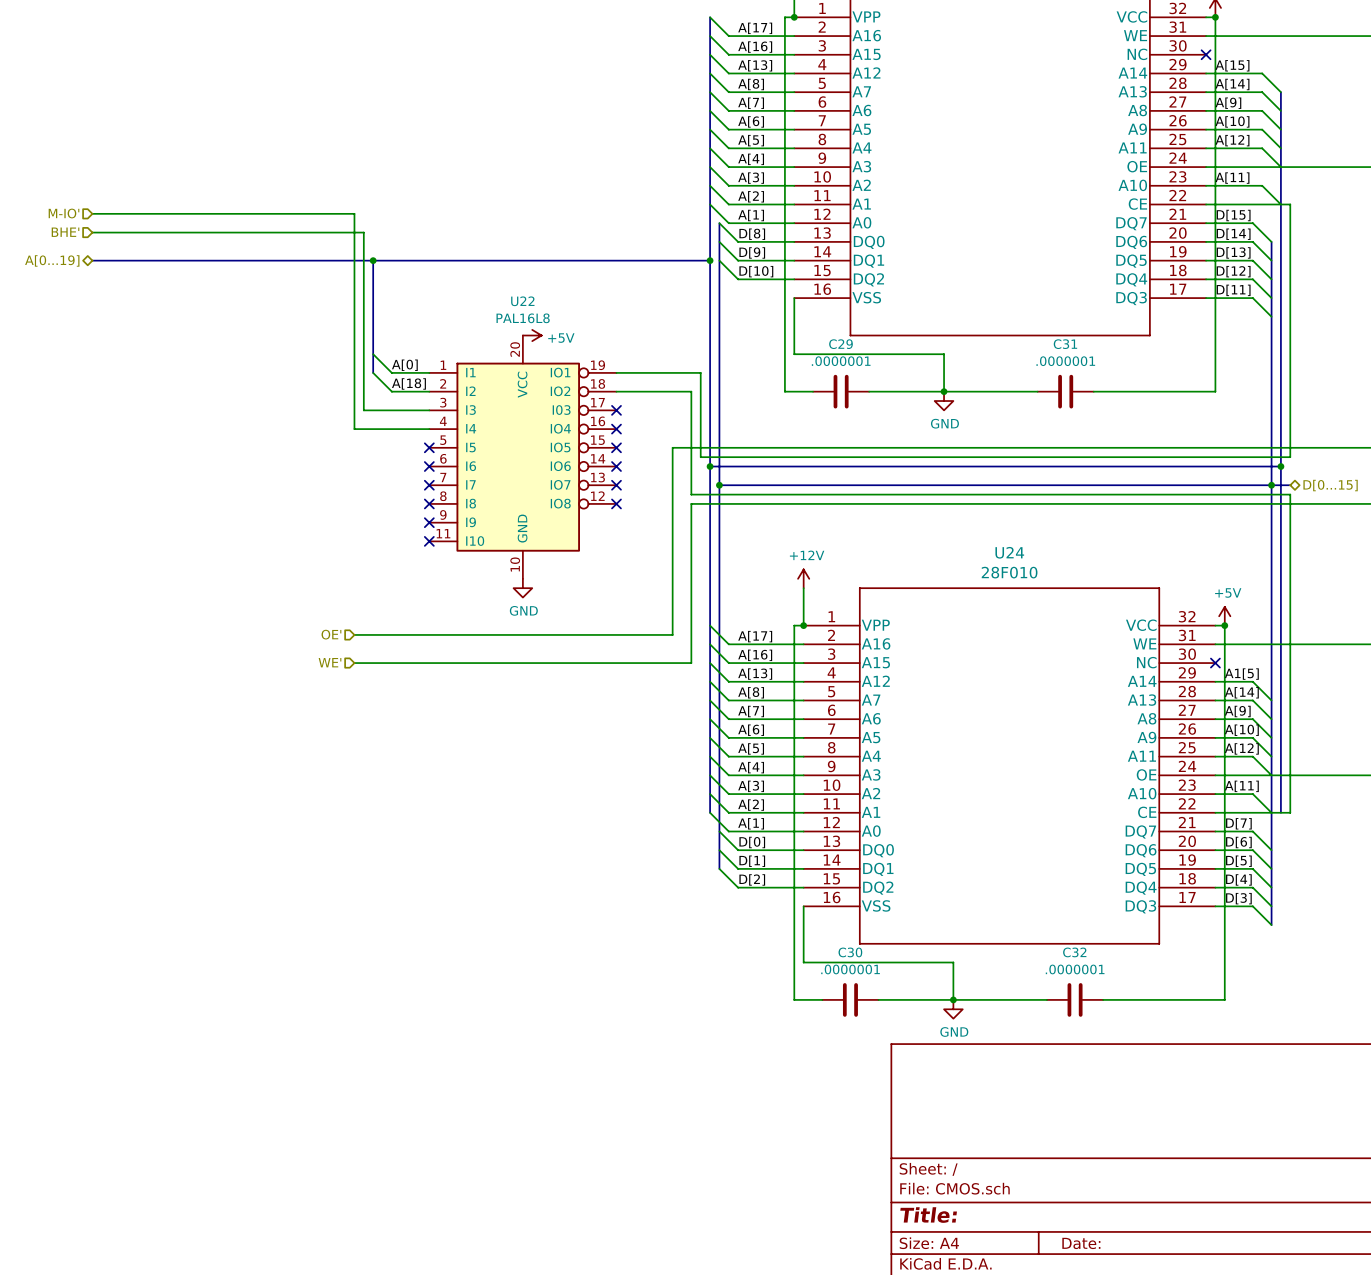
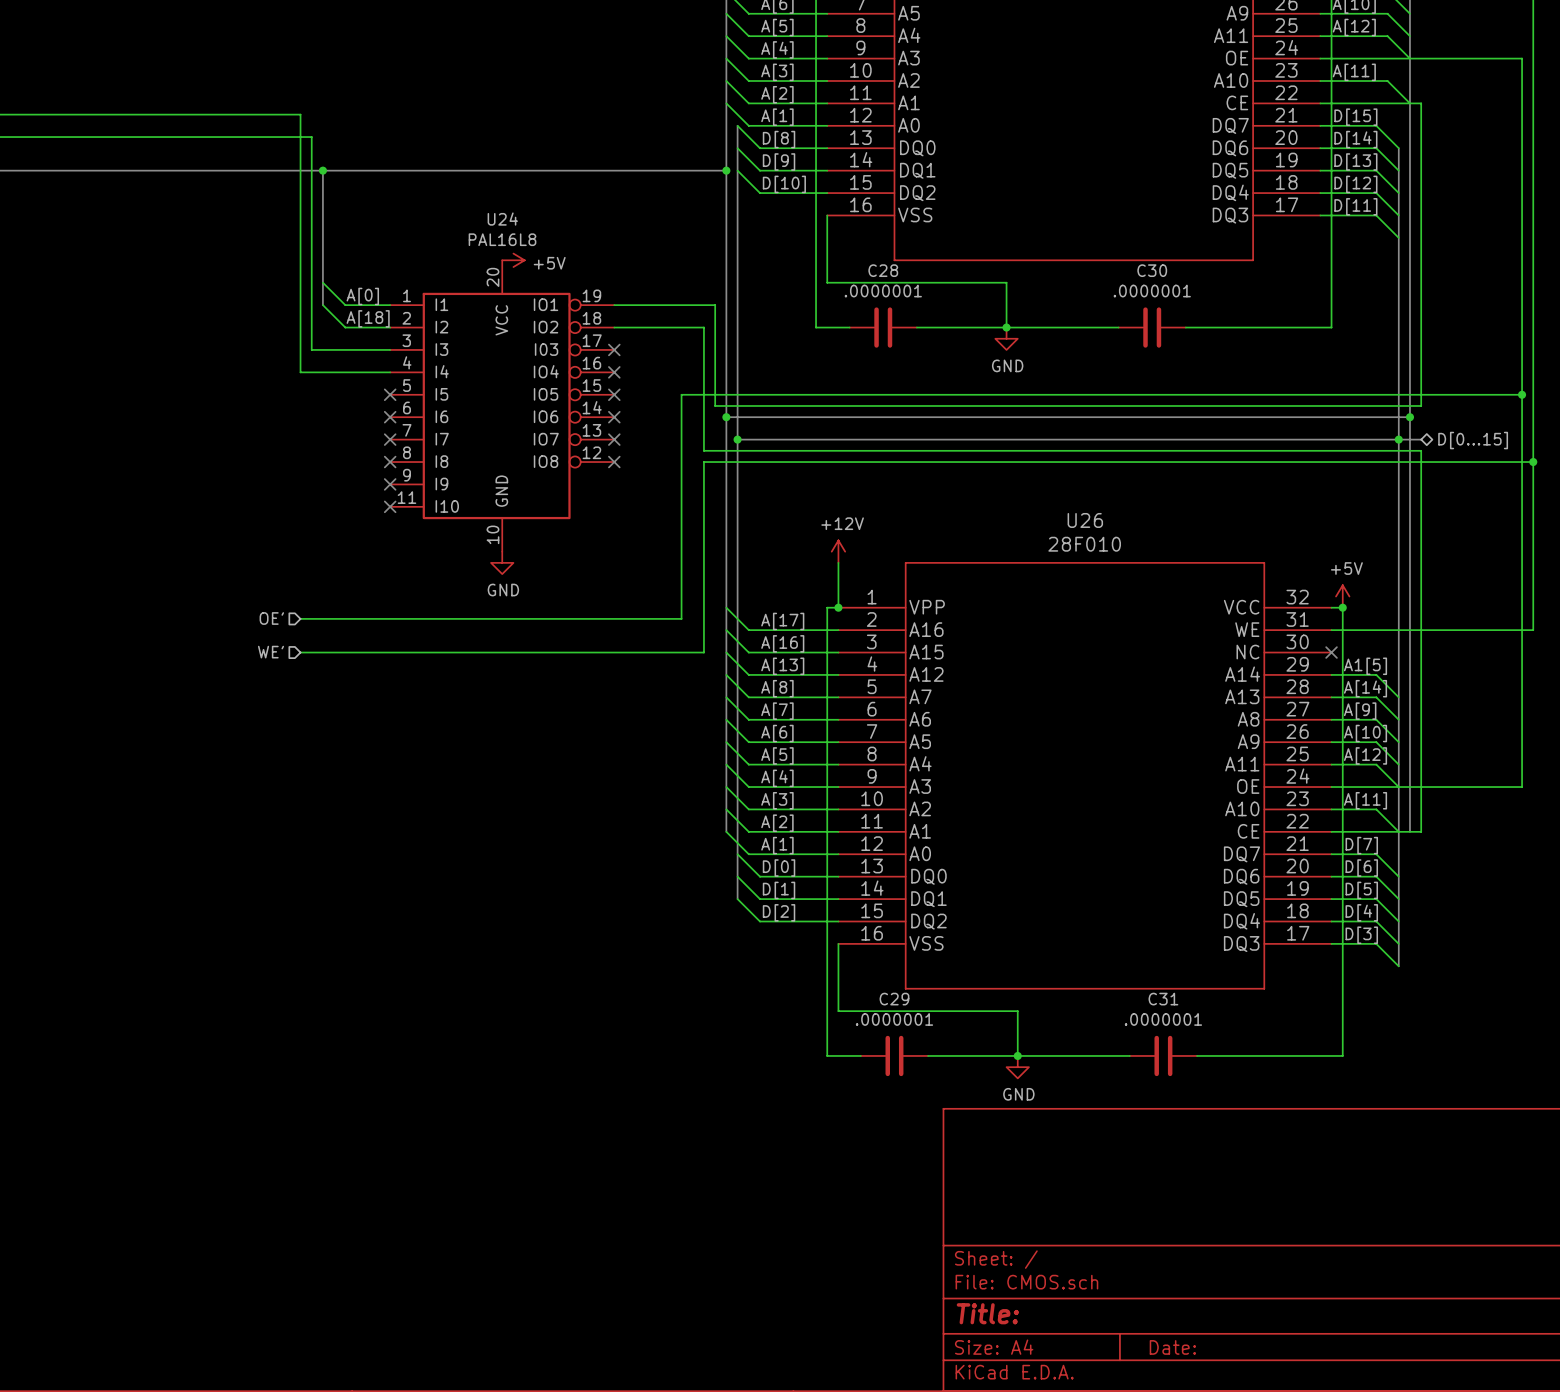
U22 name: U22 (522, 301) -> U24 (502, 219)
C29 name: C29 (841, 344) -> C28 (883, 270)
C31 name: C31 (1065, 344) -> C30 (1152, 270)
U24 name: U24 (1009, 552) -> U26 (1085, 520)
C30 name: C30 (850, 952) -> C29 (894, 999)
C32 name: C32 (1074, 952) -> C31 (1163, 999)

